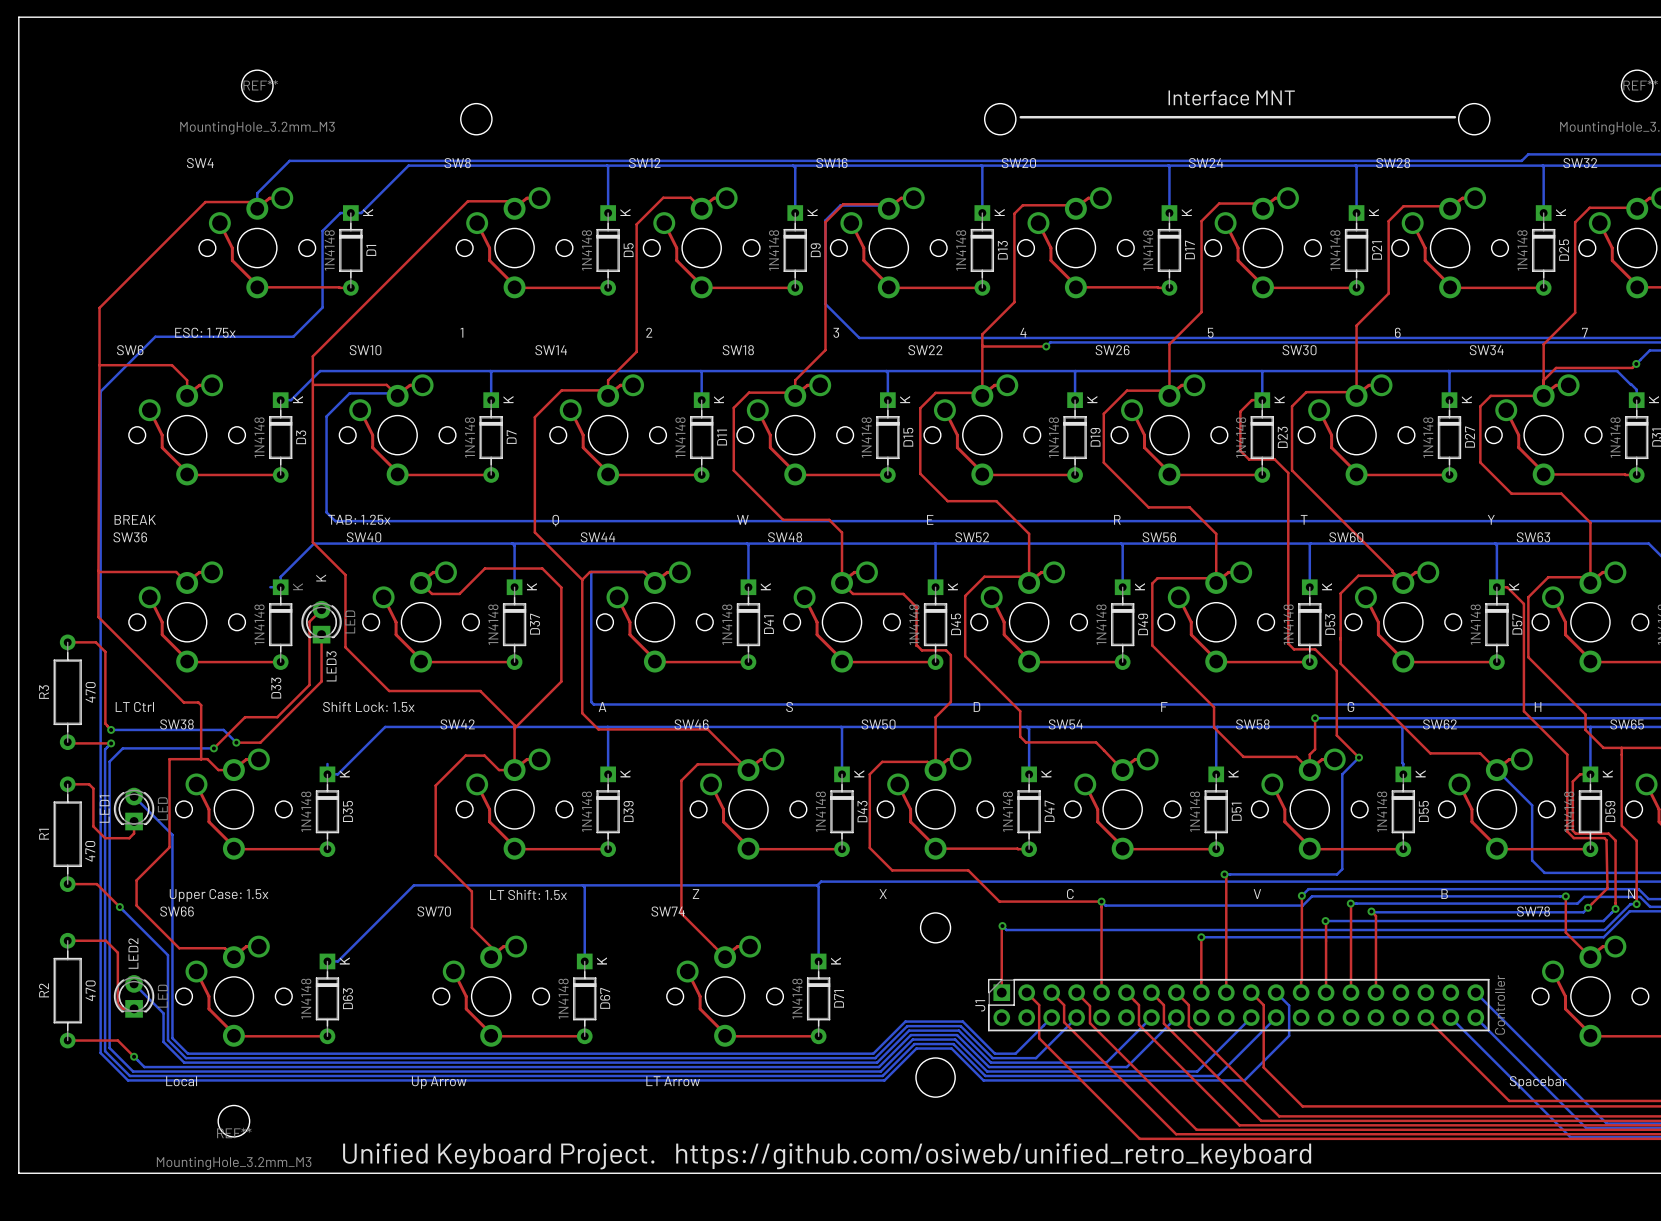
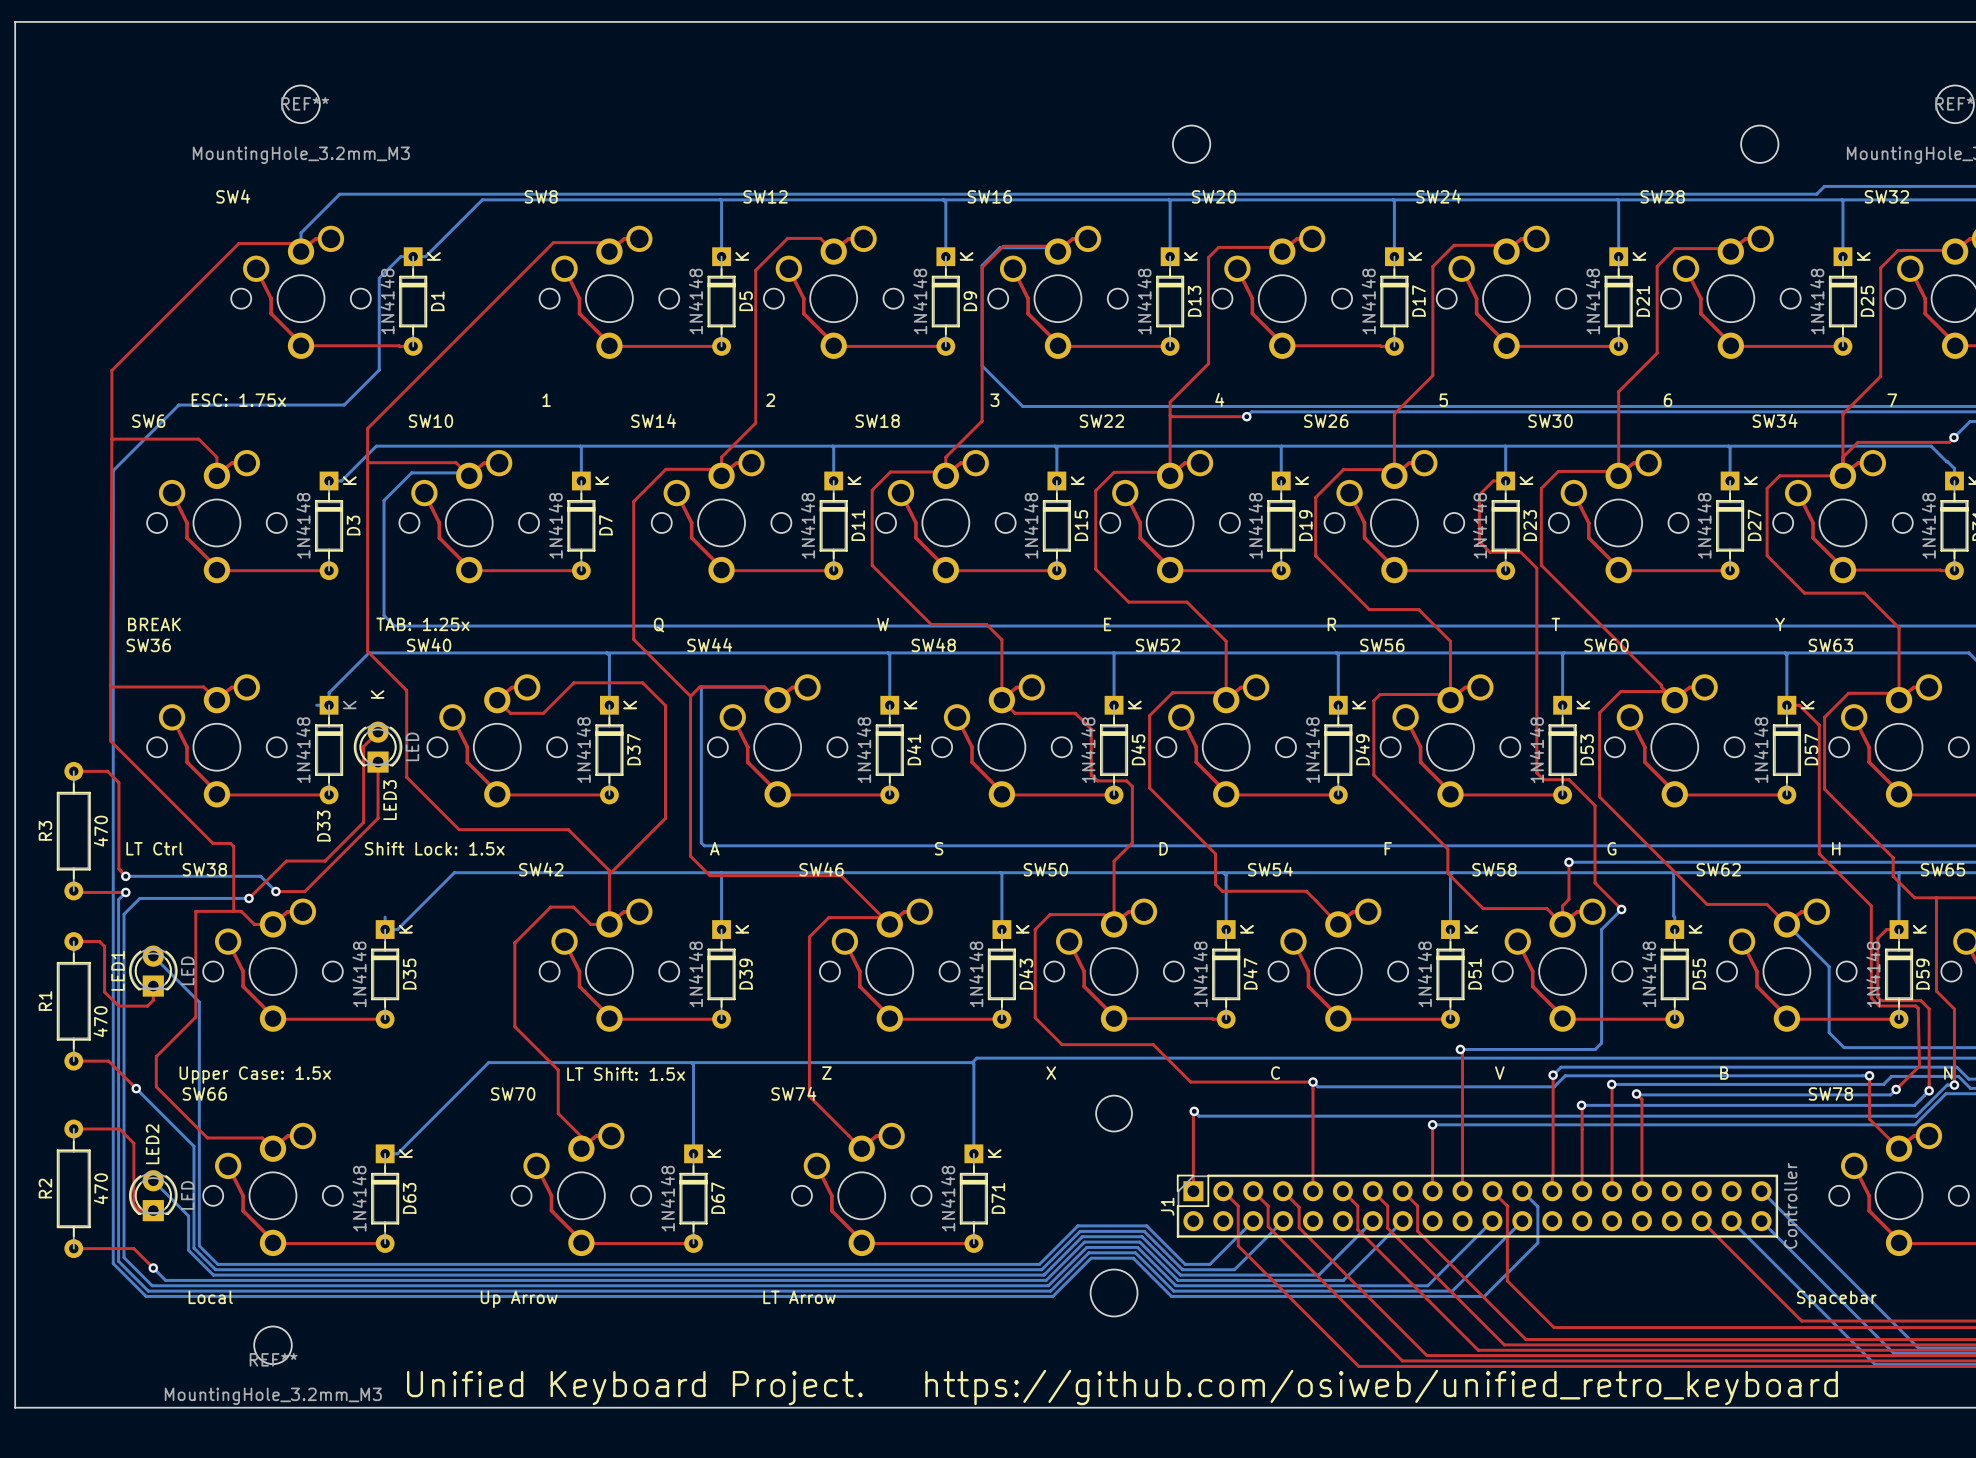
text: Interface MNT (1231, 97) -> none
J1 footprint: [460, 103, 1490, 1032] -> [1172, 125, 1779, 1238]
line: (1020, 117) (1454, 117) -> none

